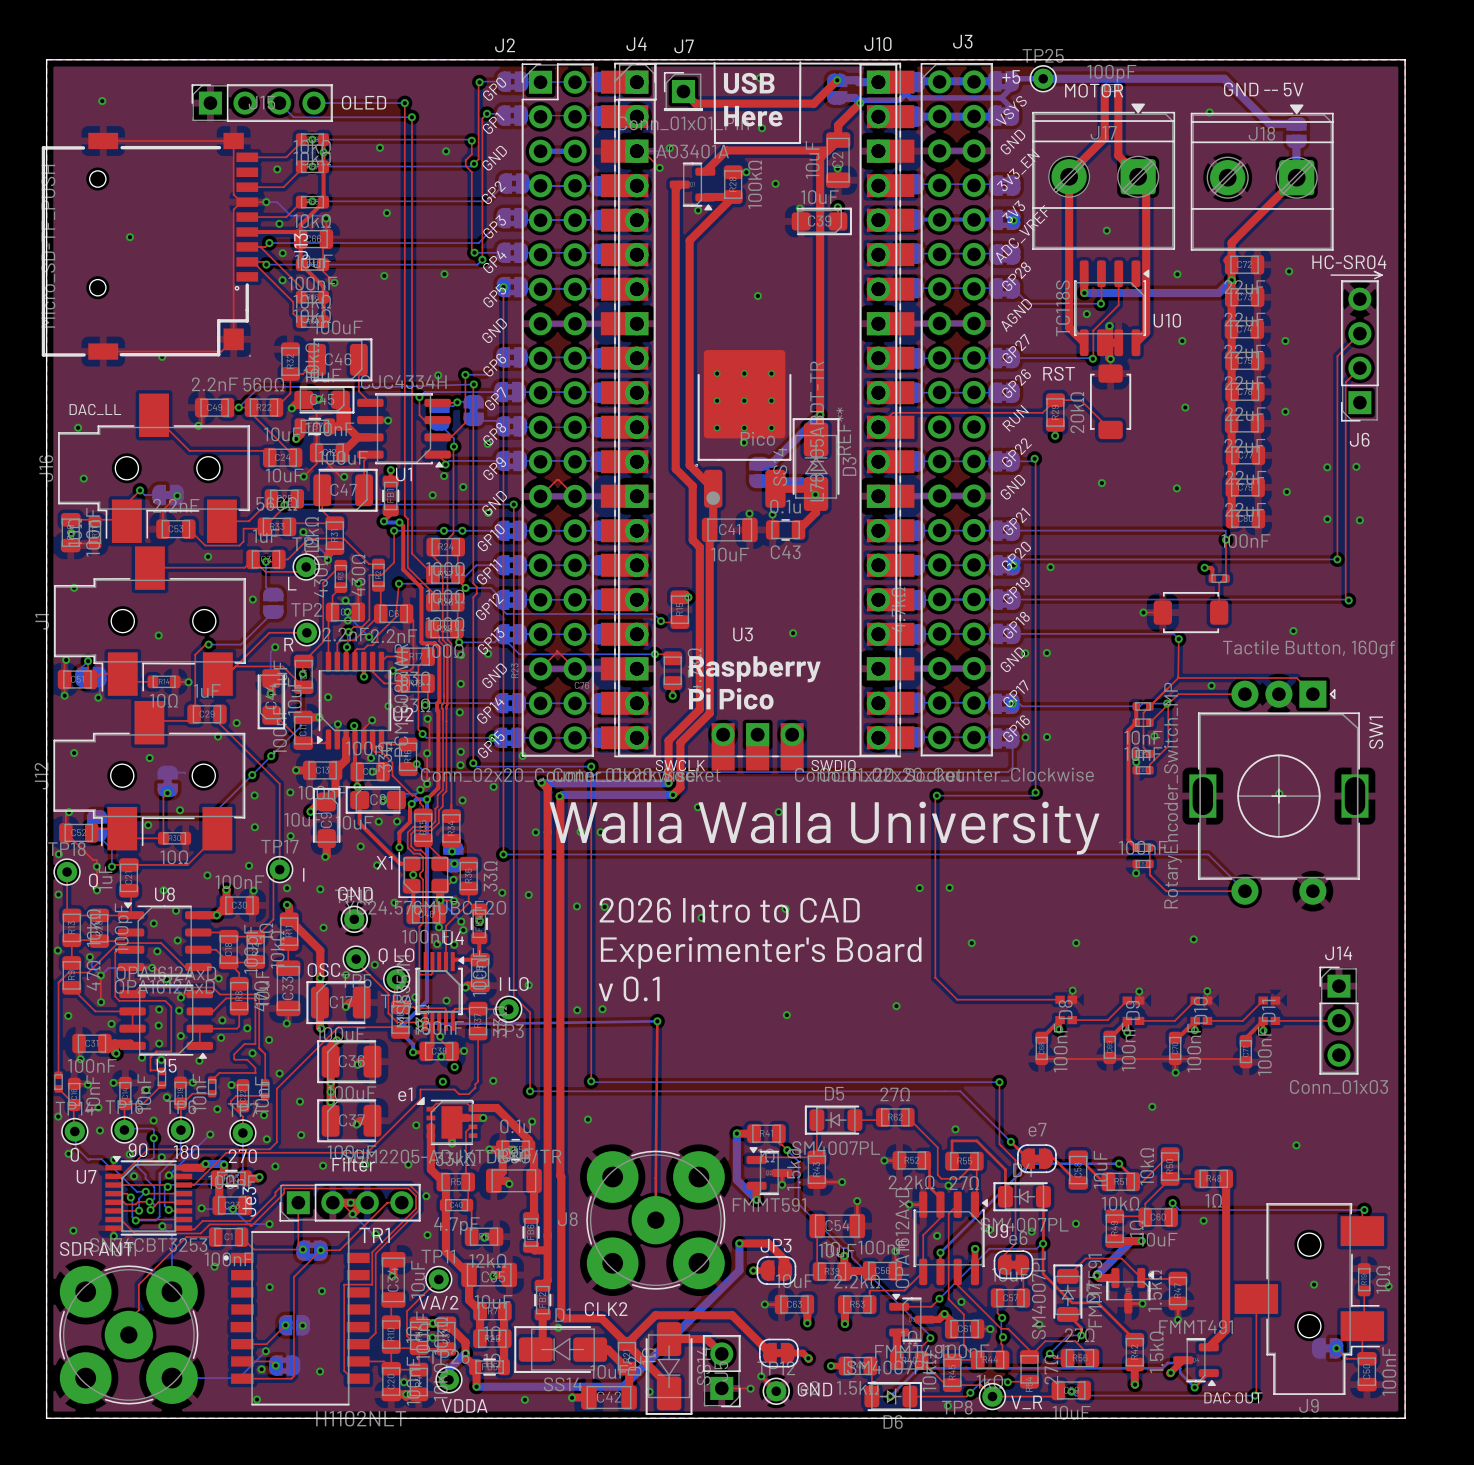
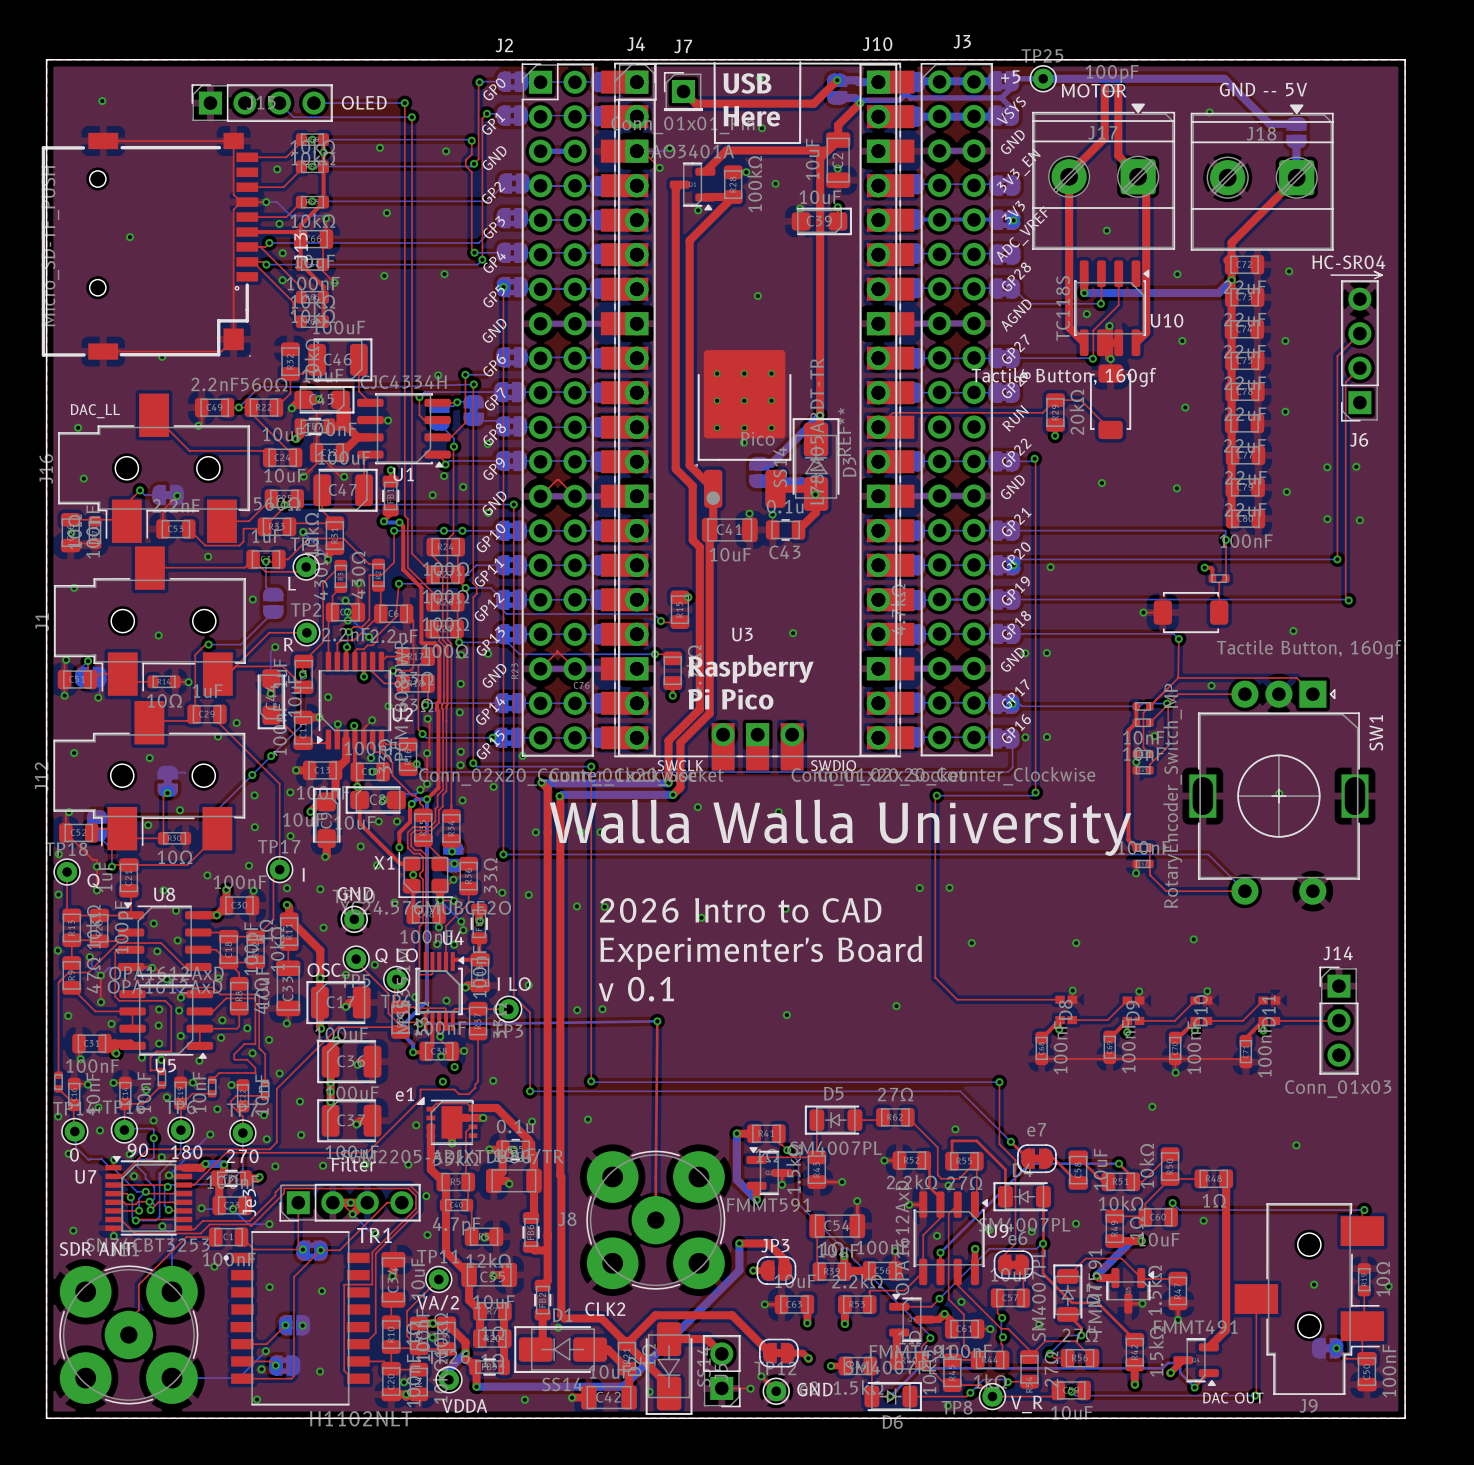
part text: RST (1059, 373) -> none
part value: none -> Tactile Button, 160gf (1064, 377)

